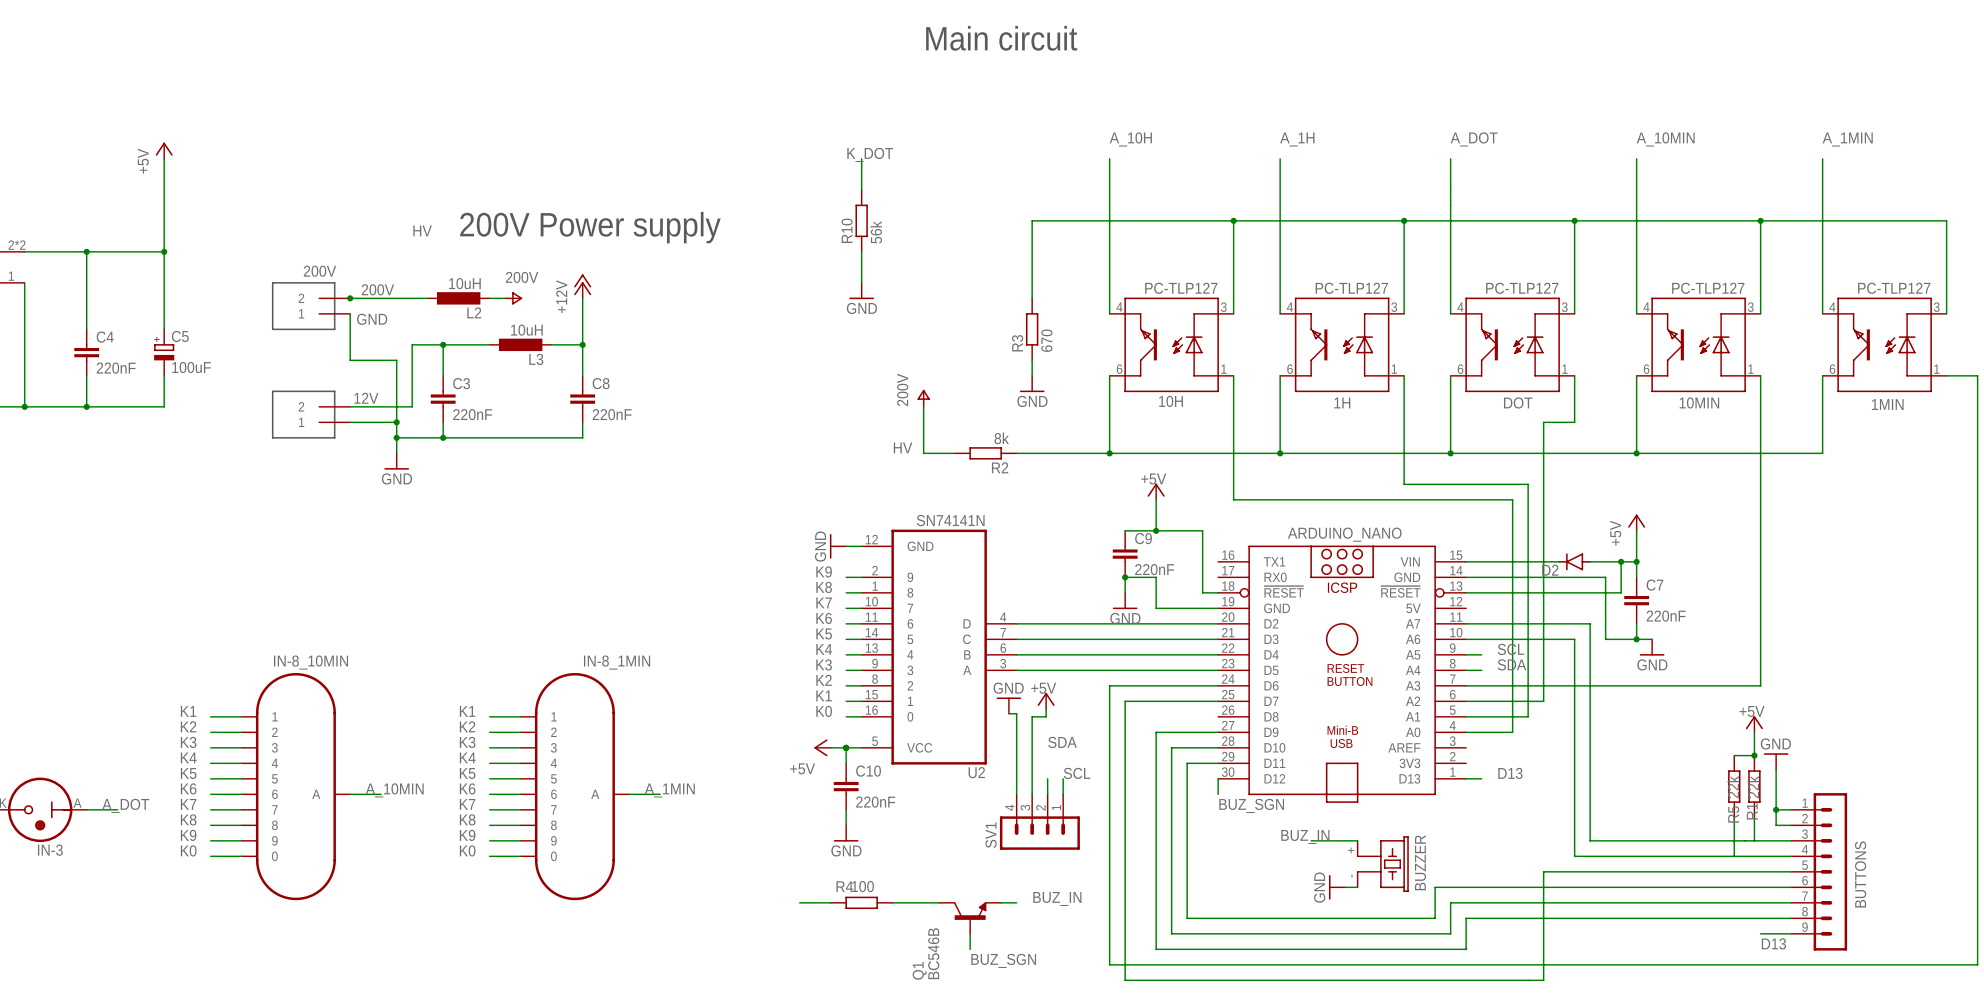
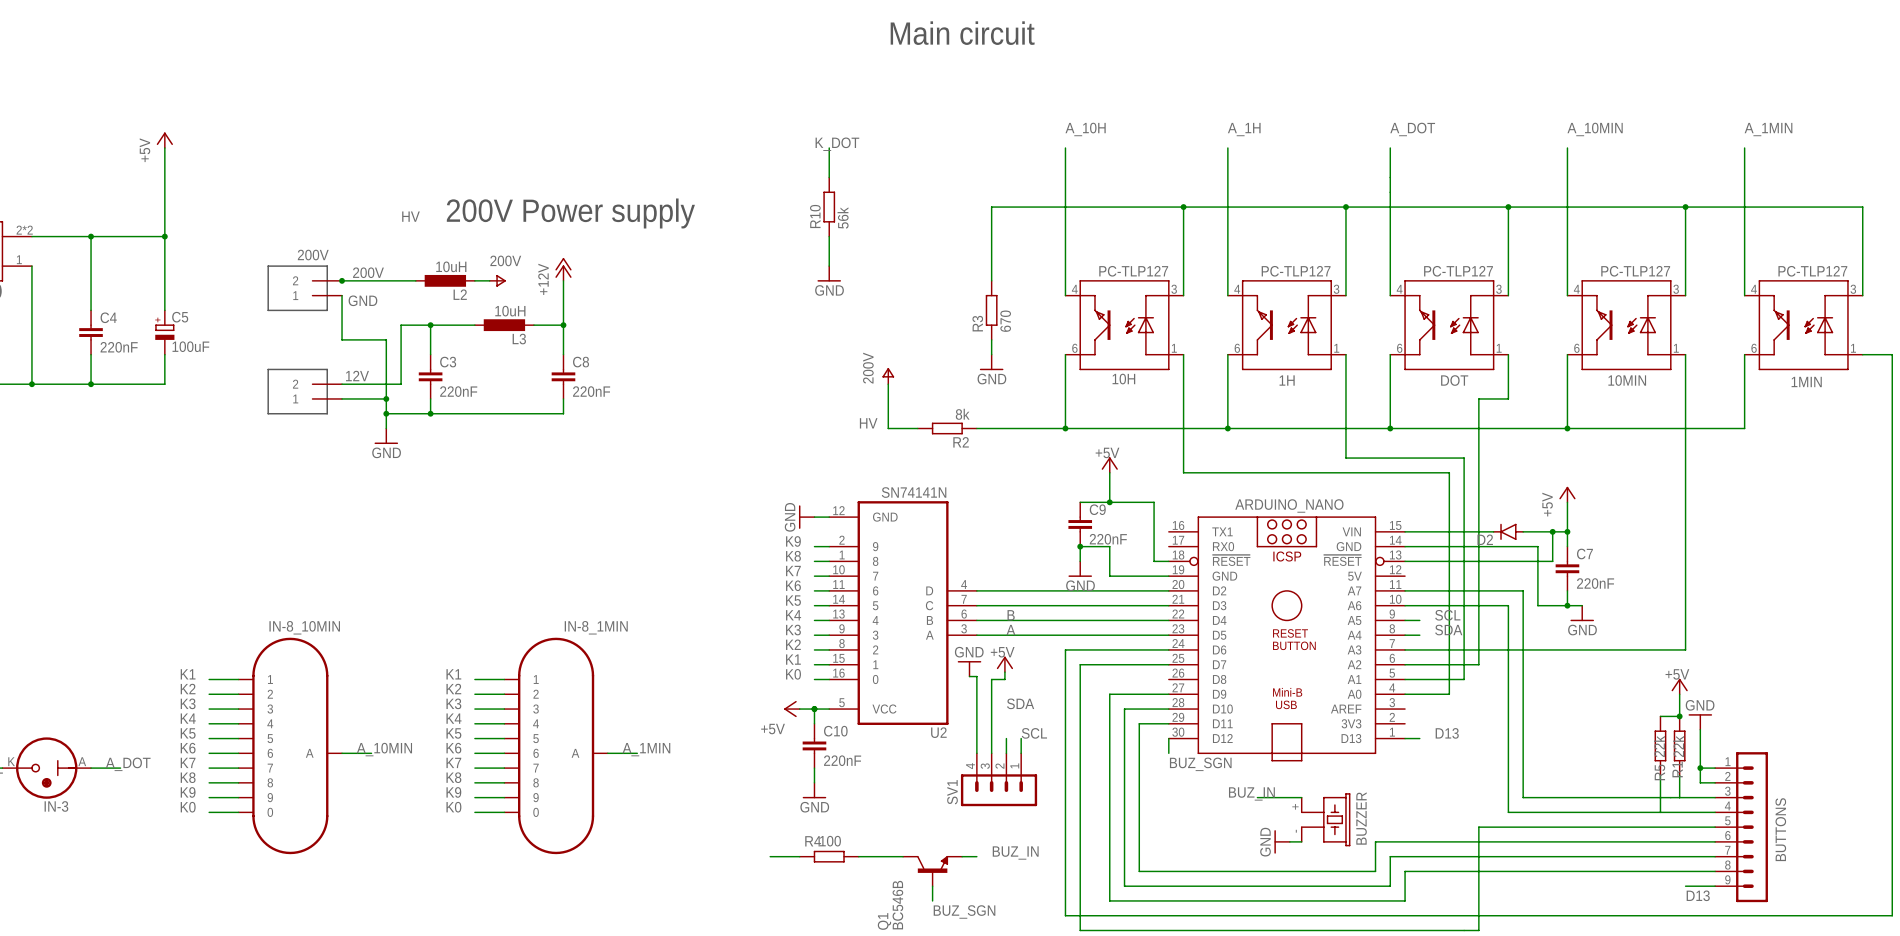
label: none -> B (1011, 615)
label: none -> A (1010, 630)

